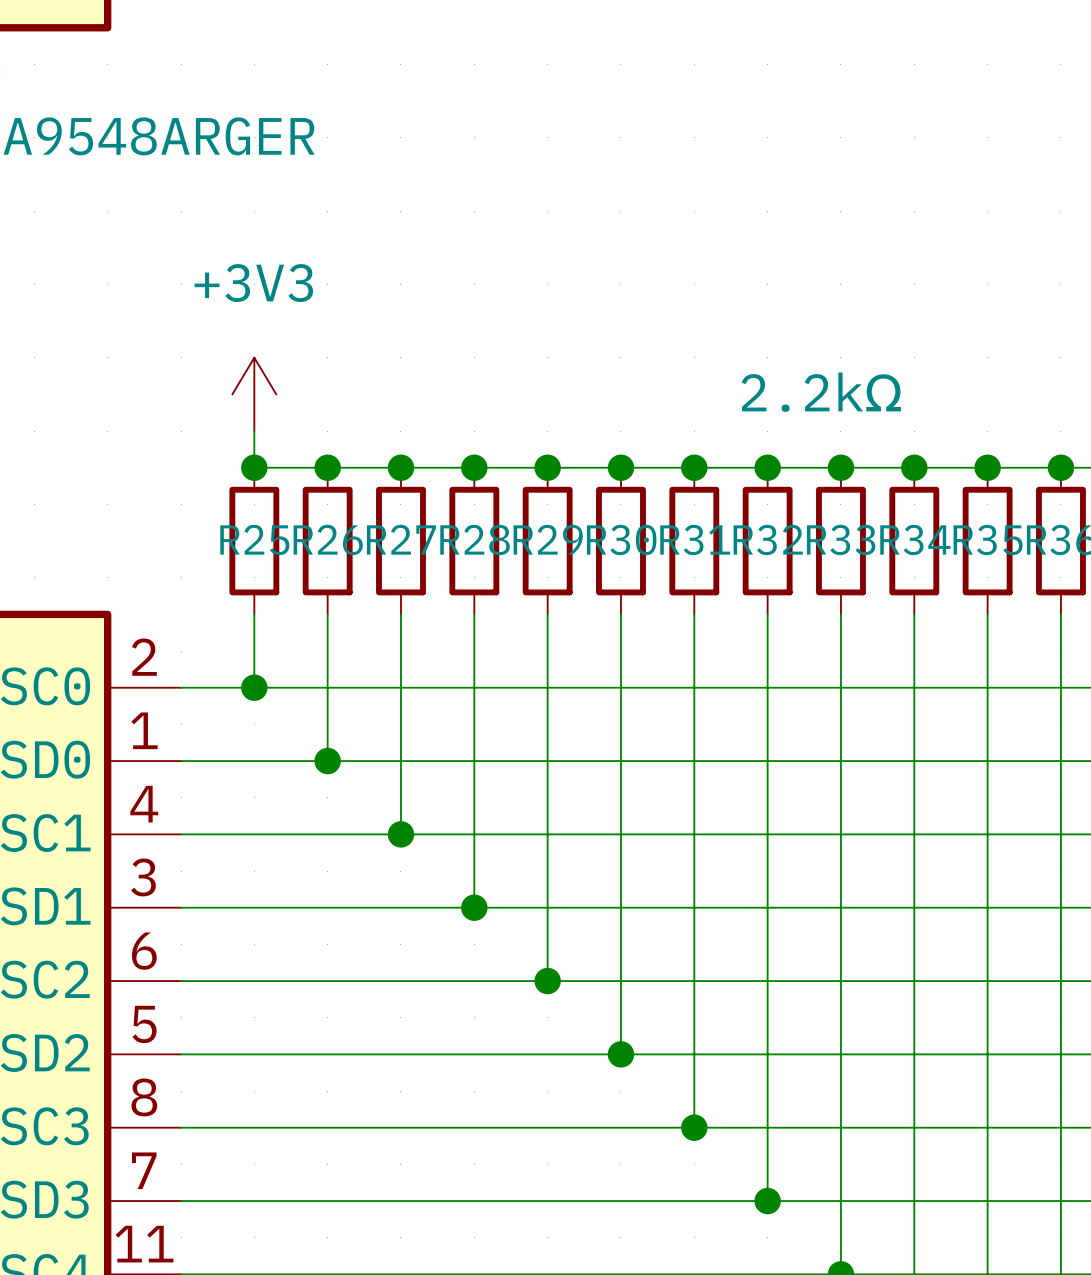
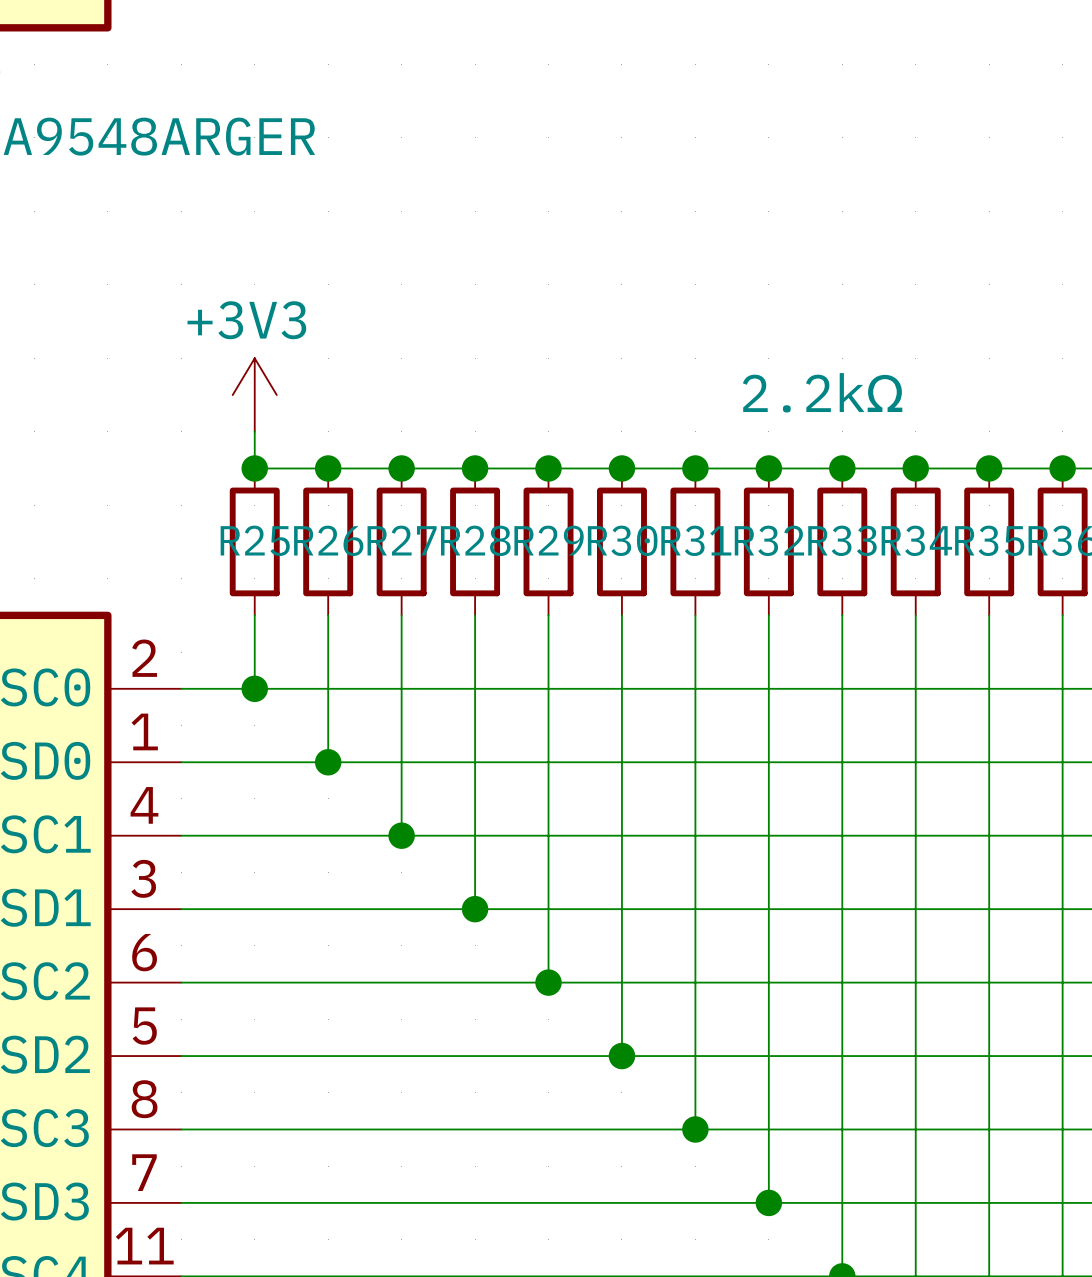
power symbol text position: +3V3 (253, 283) -> +3V3 (246, 320)

